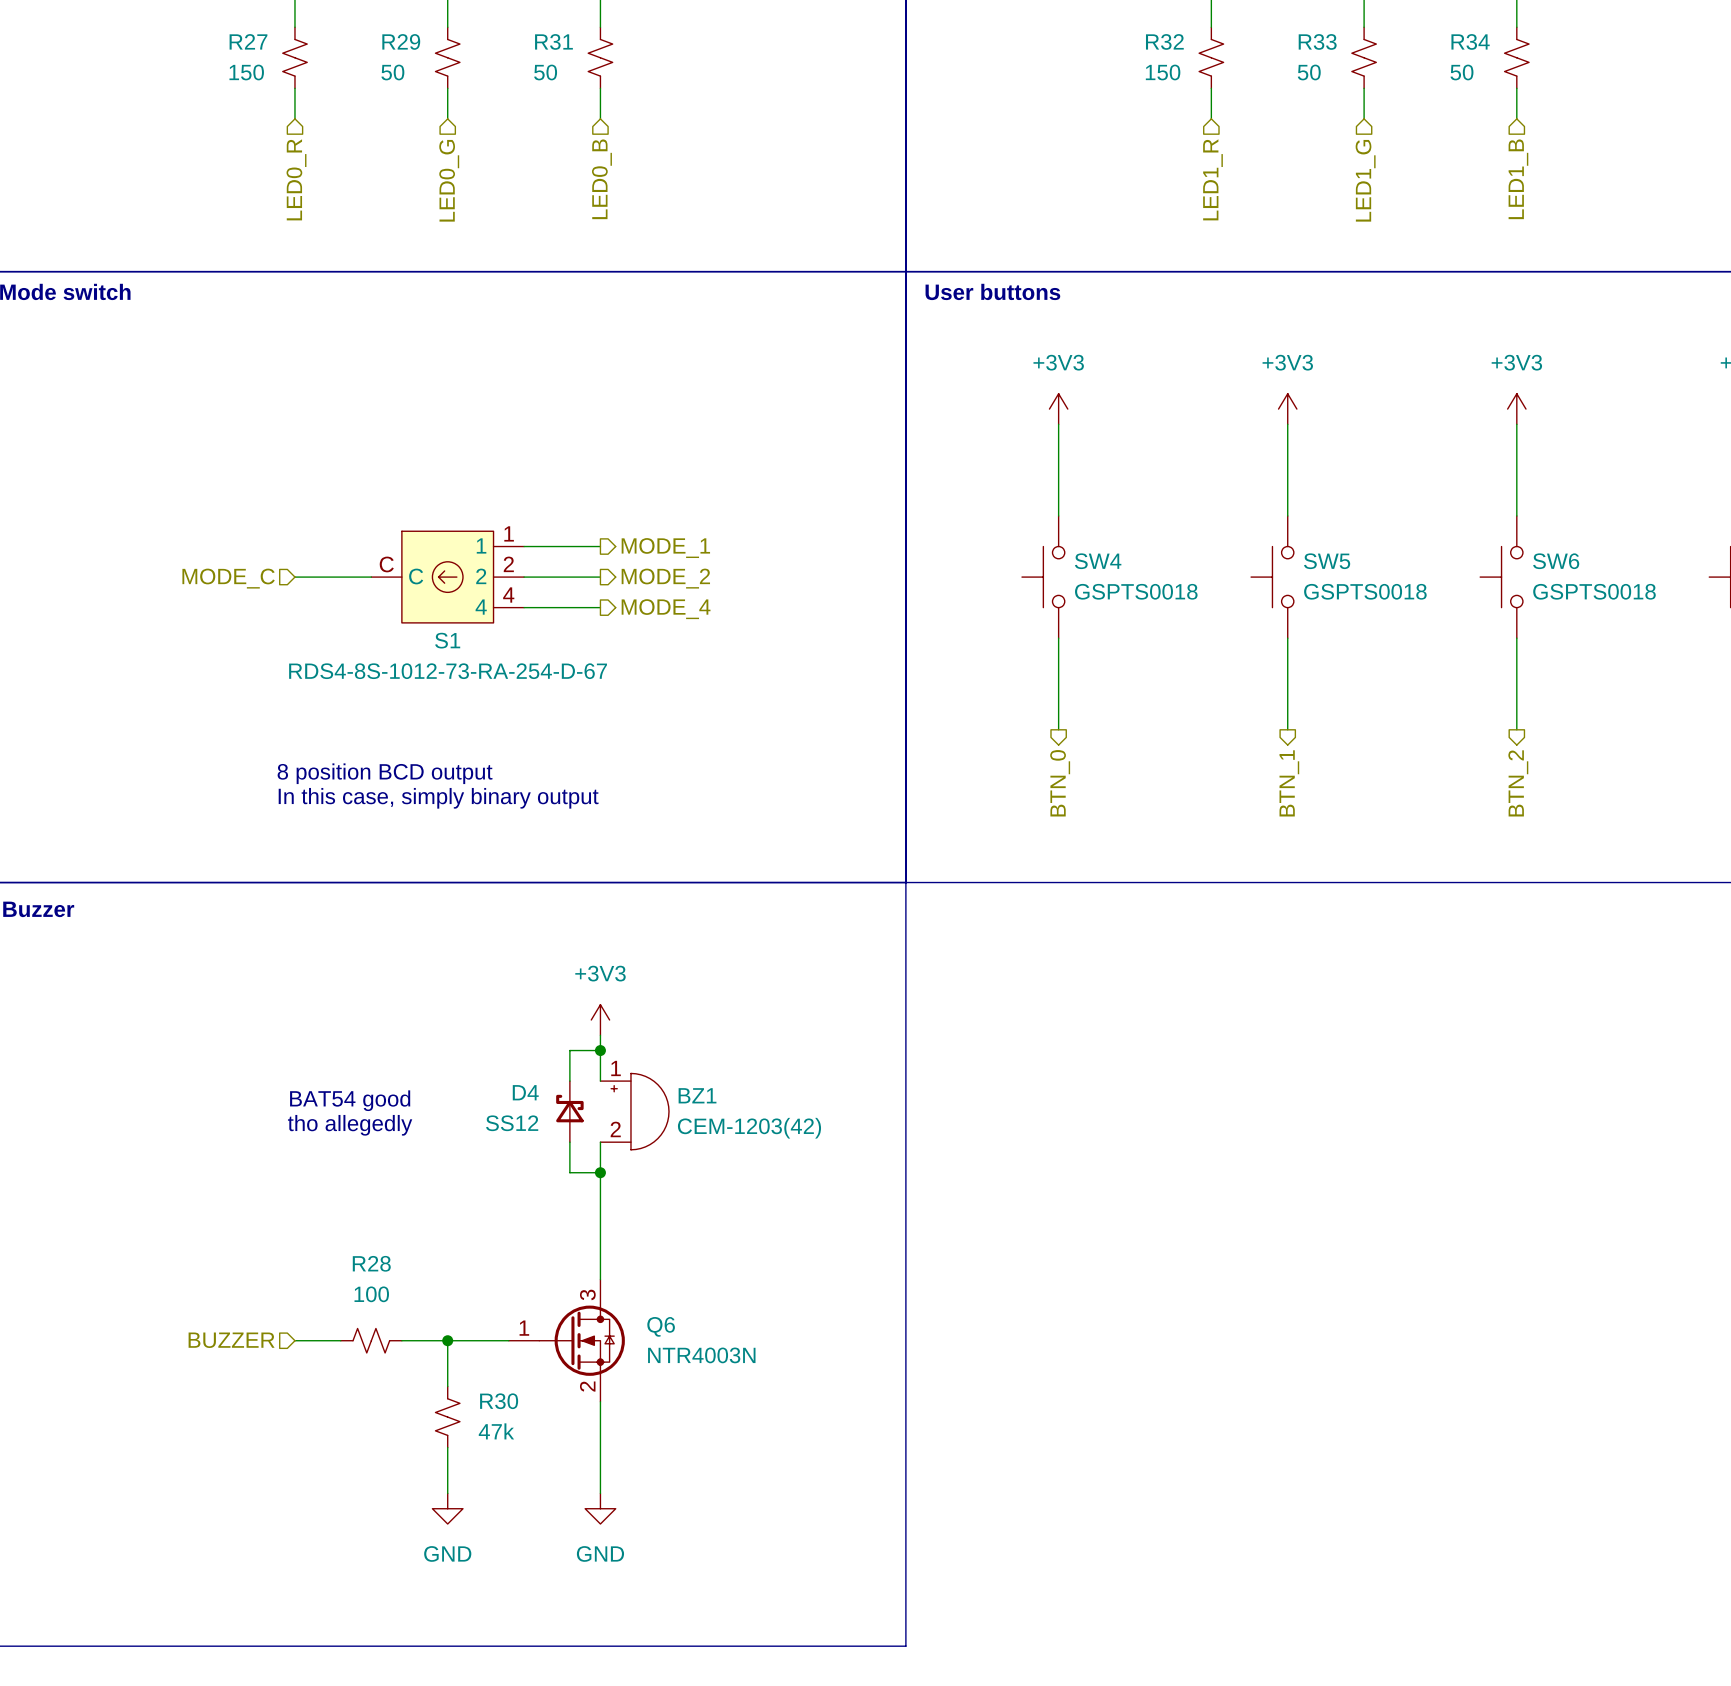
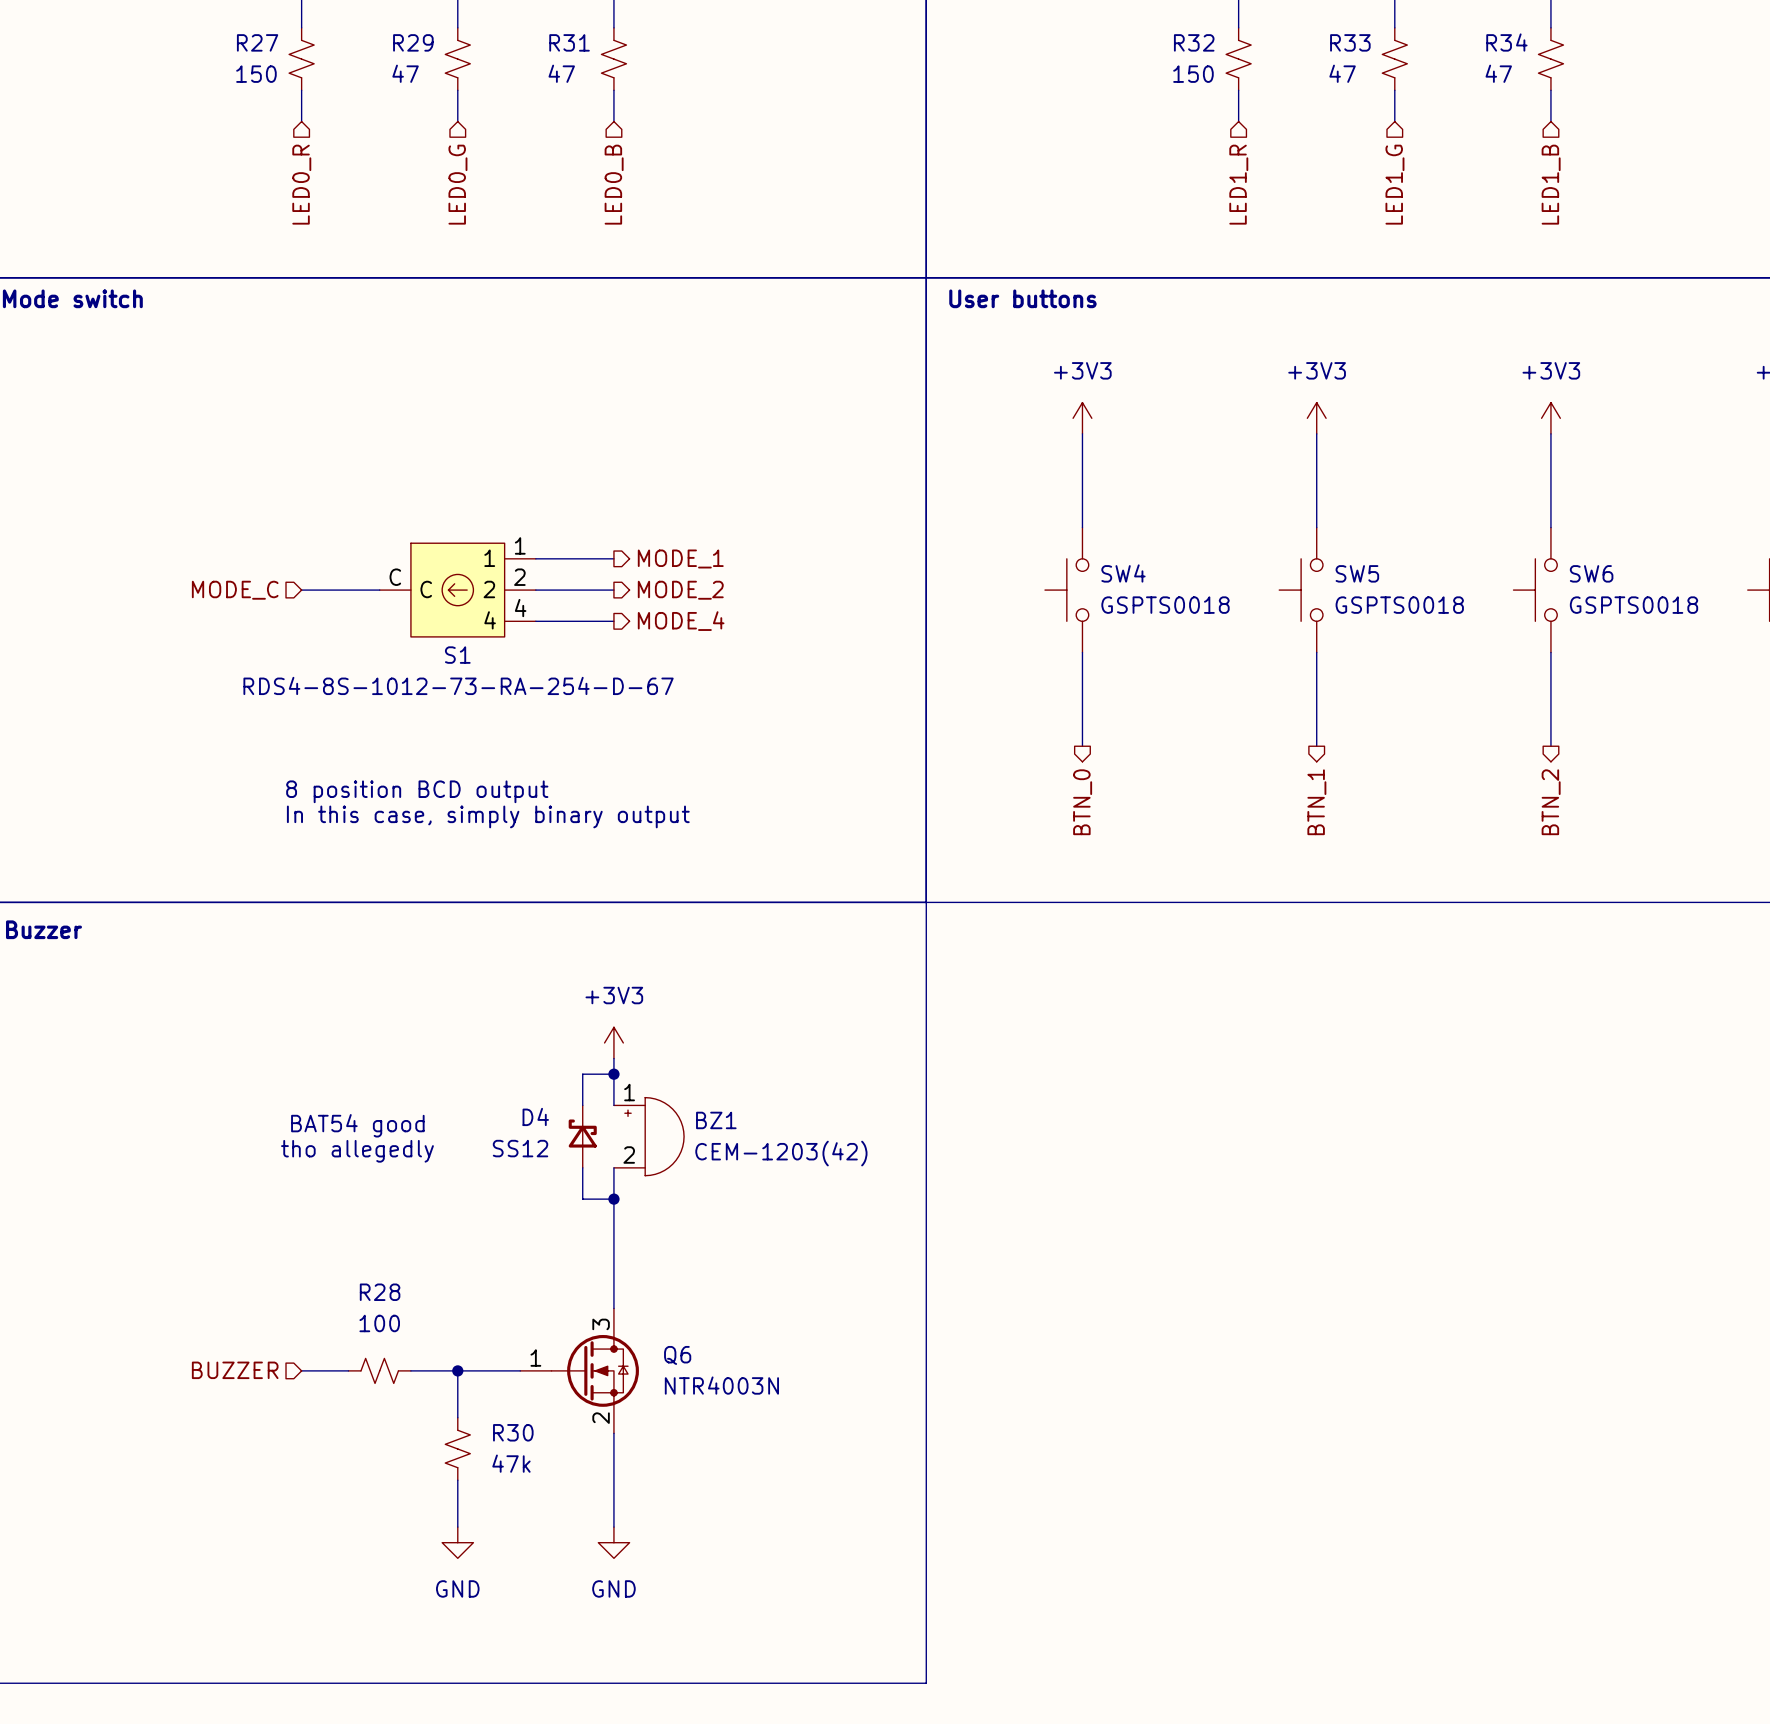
R29 value: 50 (392, 72) -> 47 (405, 73)
R31 value: 50 (545, 72) -> 47 (561, 73)
R33 value: 50 (1309, 72) -> 47 (1342, 73)
R34 value: 50 (1461, 72) -> 47 (1498, 73)

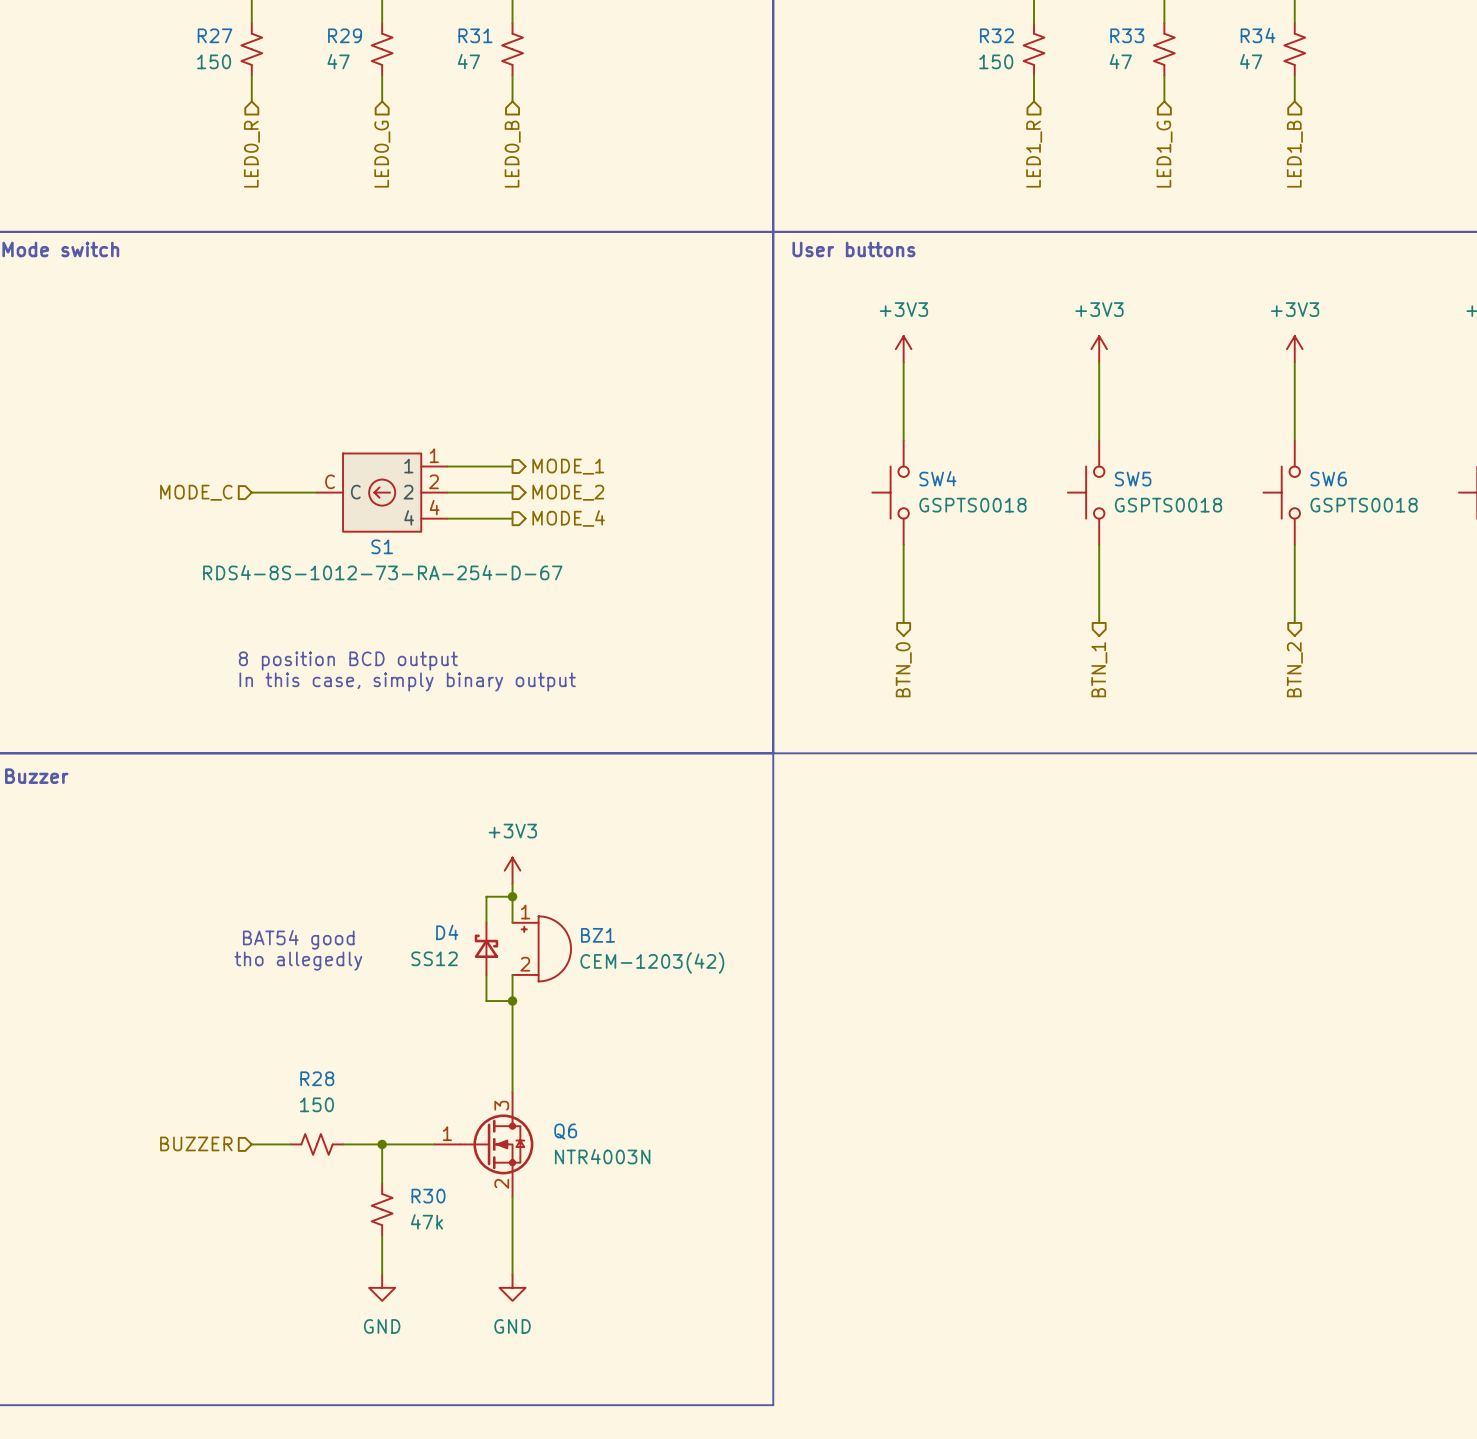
R28 value: 100 (379, 1323) -> 150 (316, 1104)

